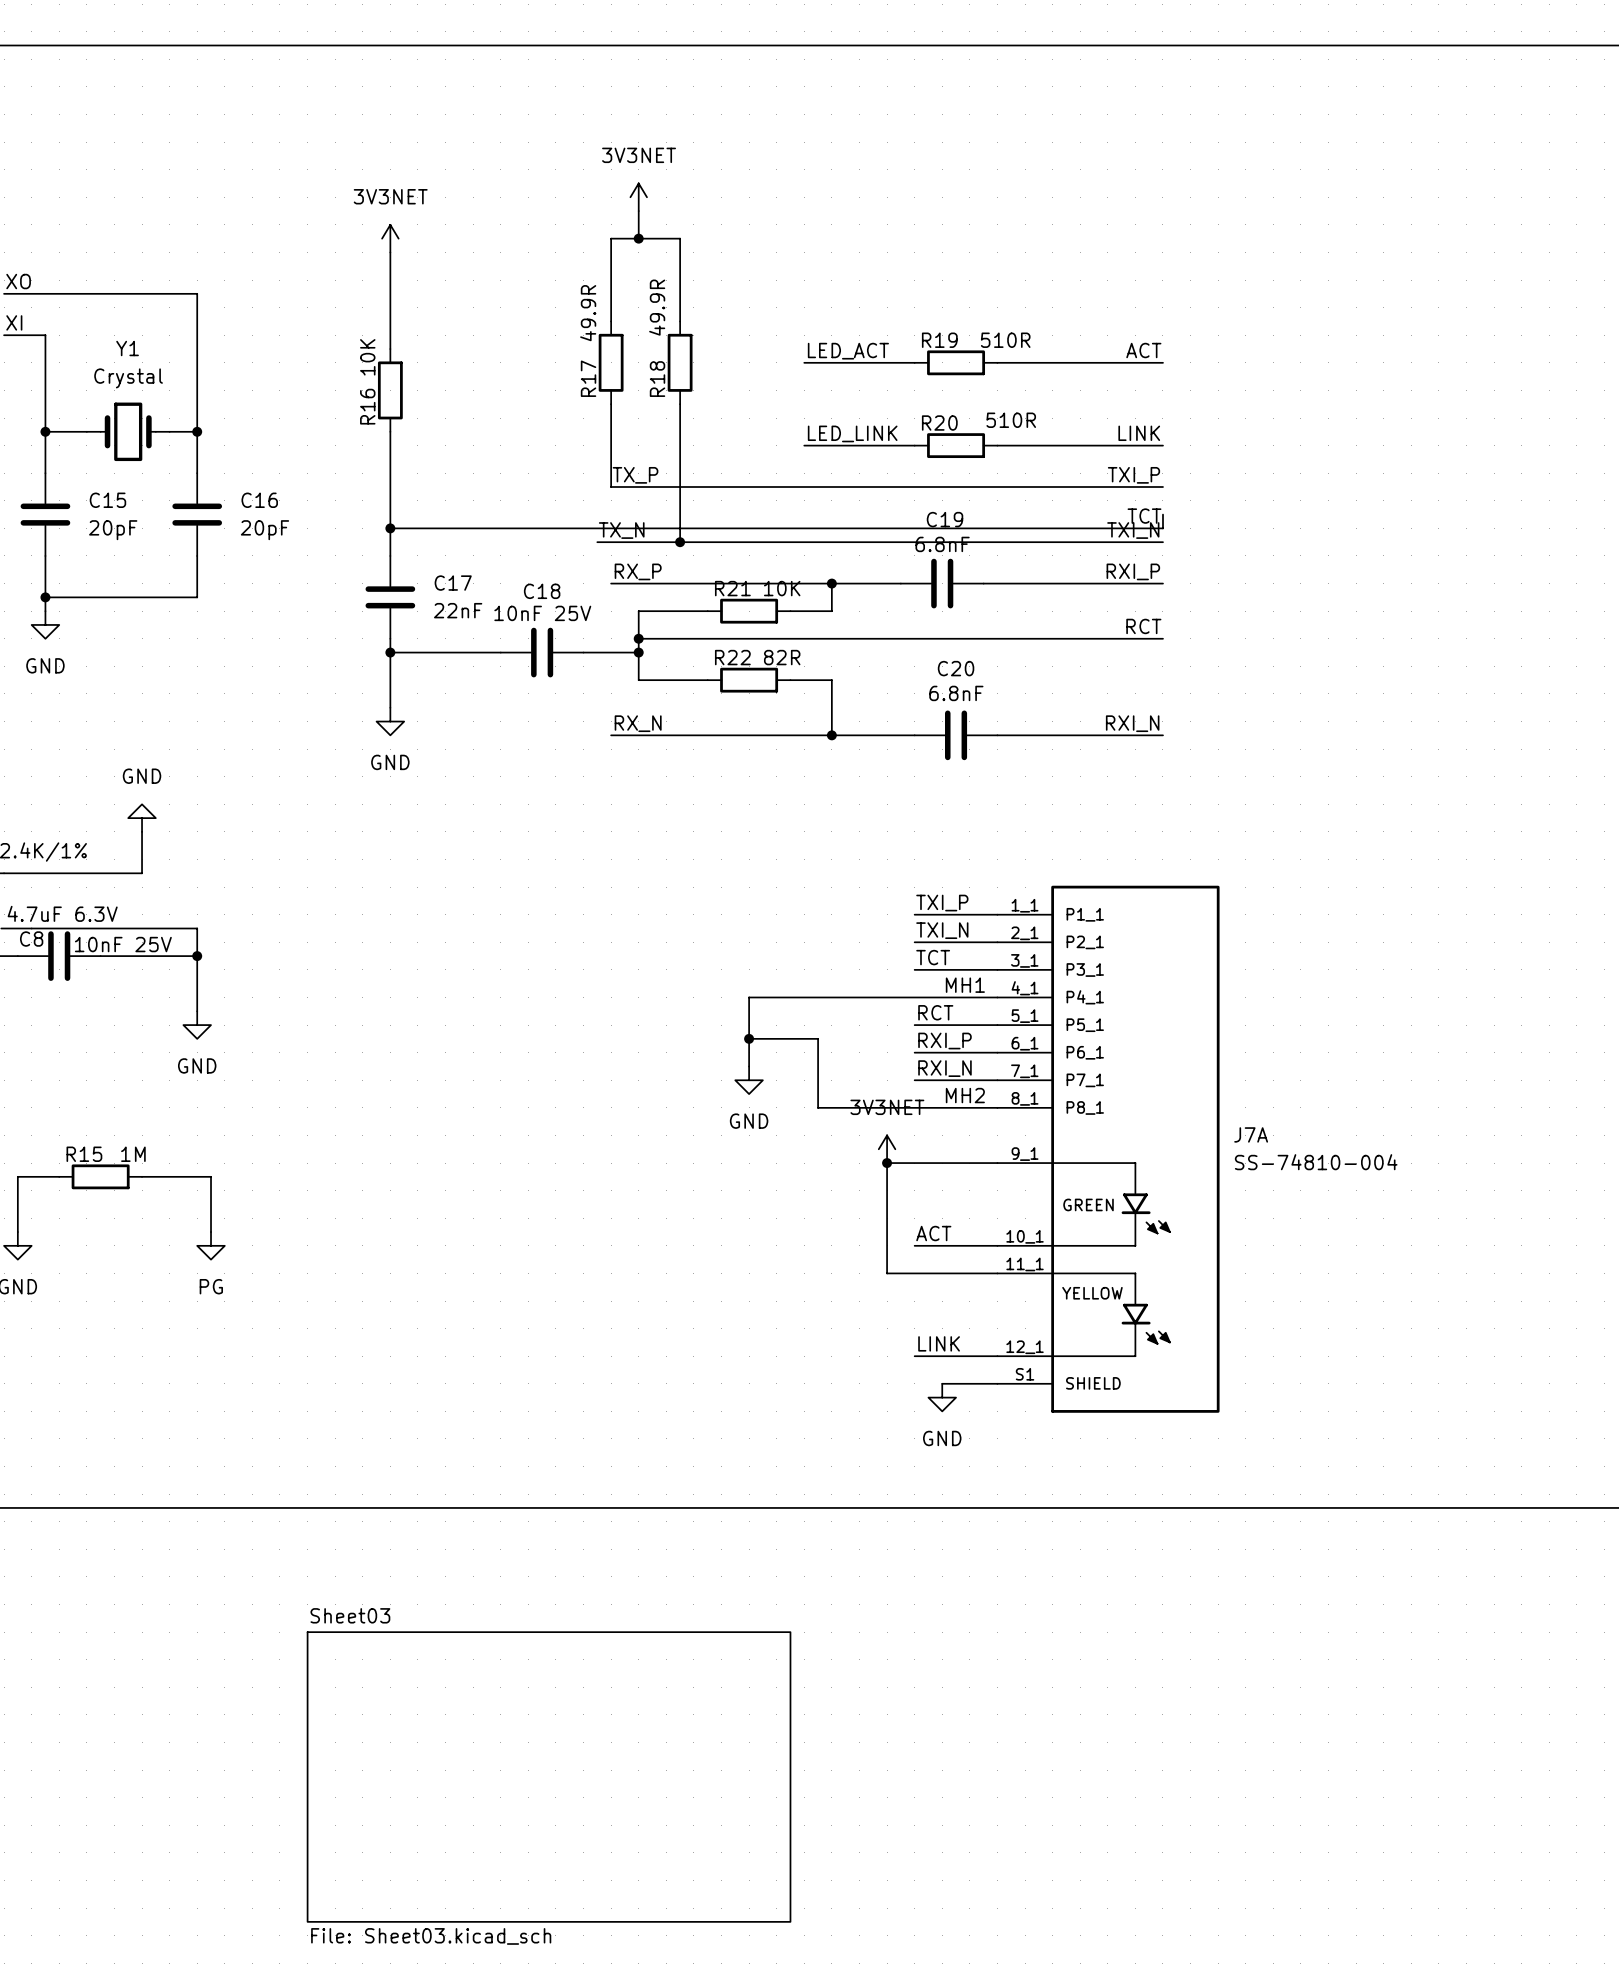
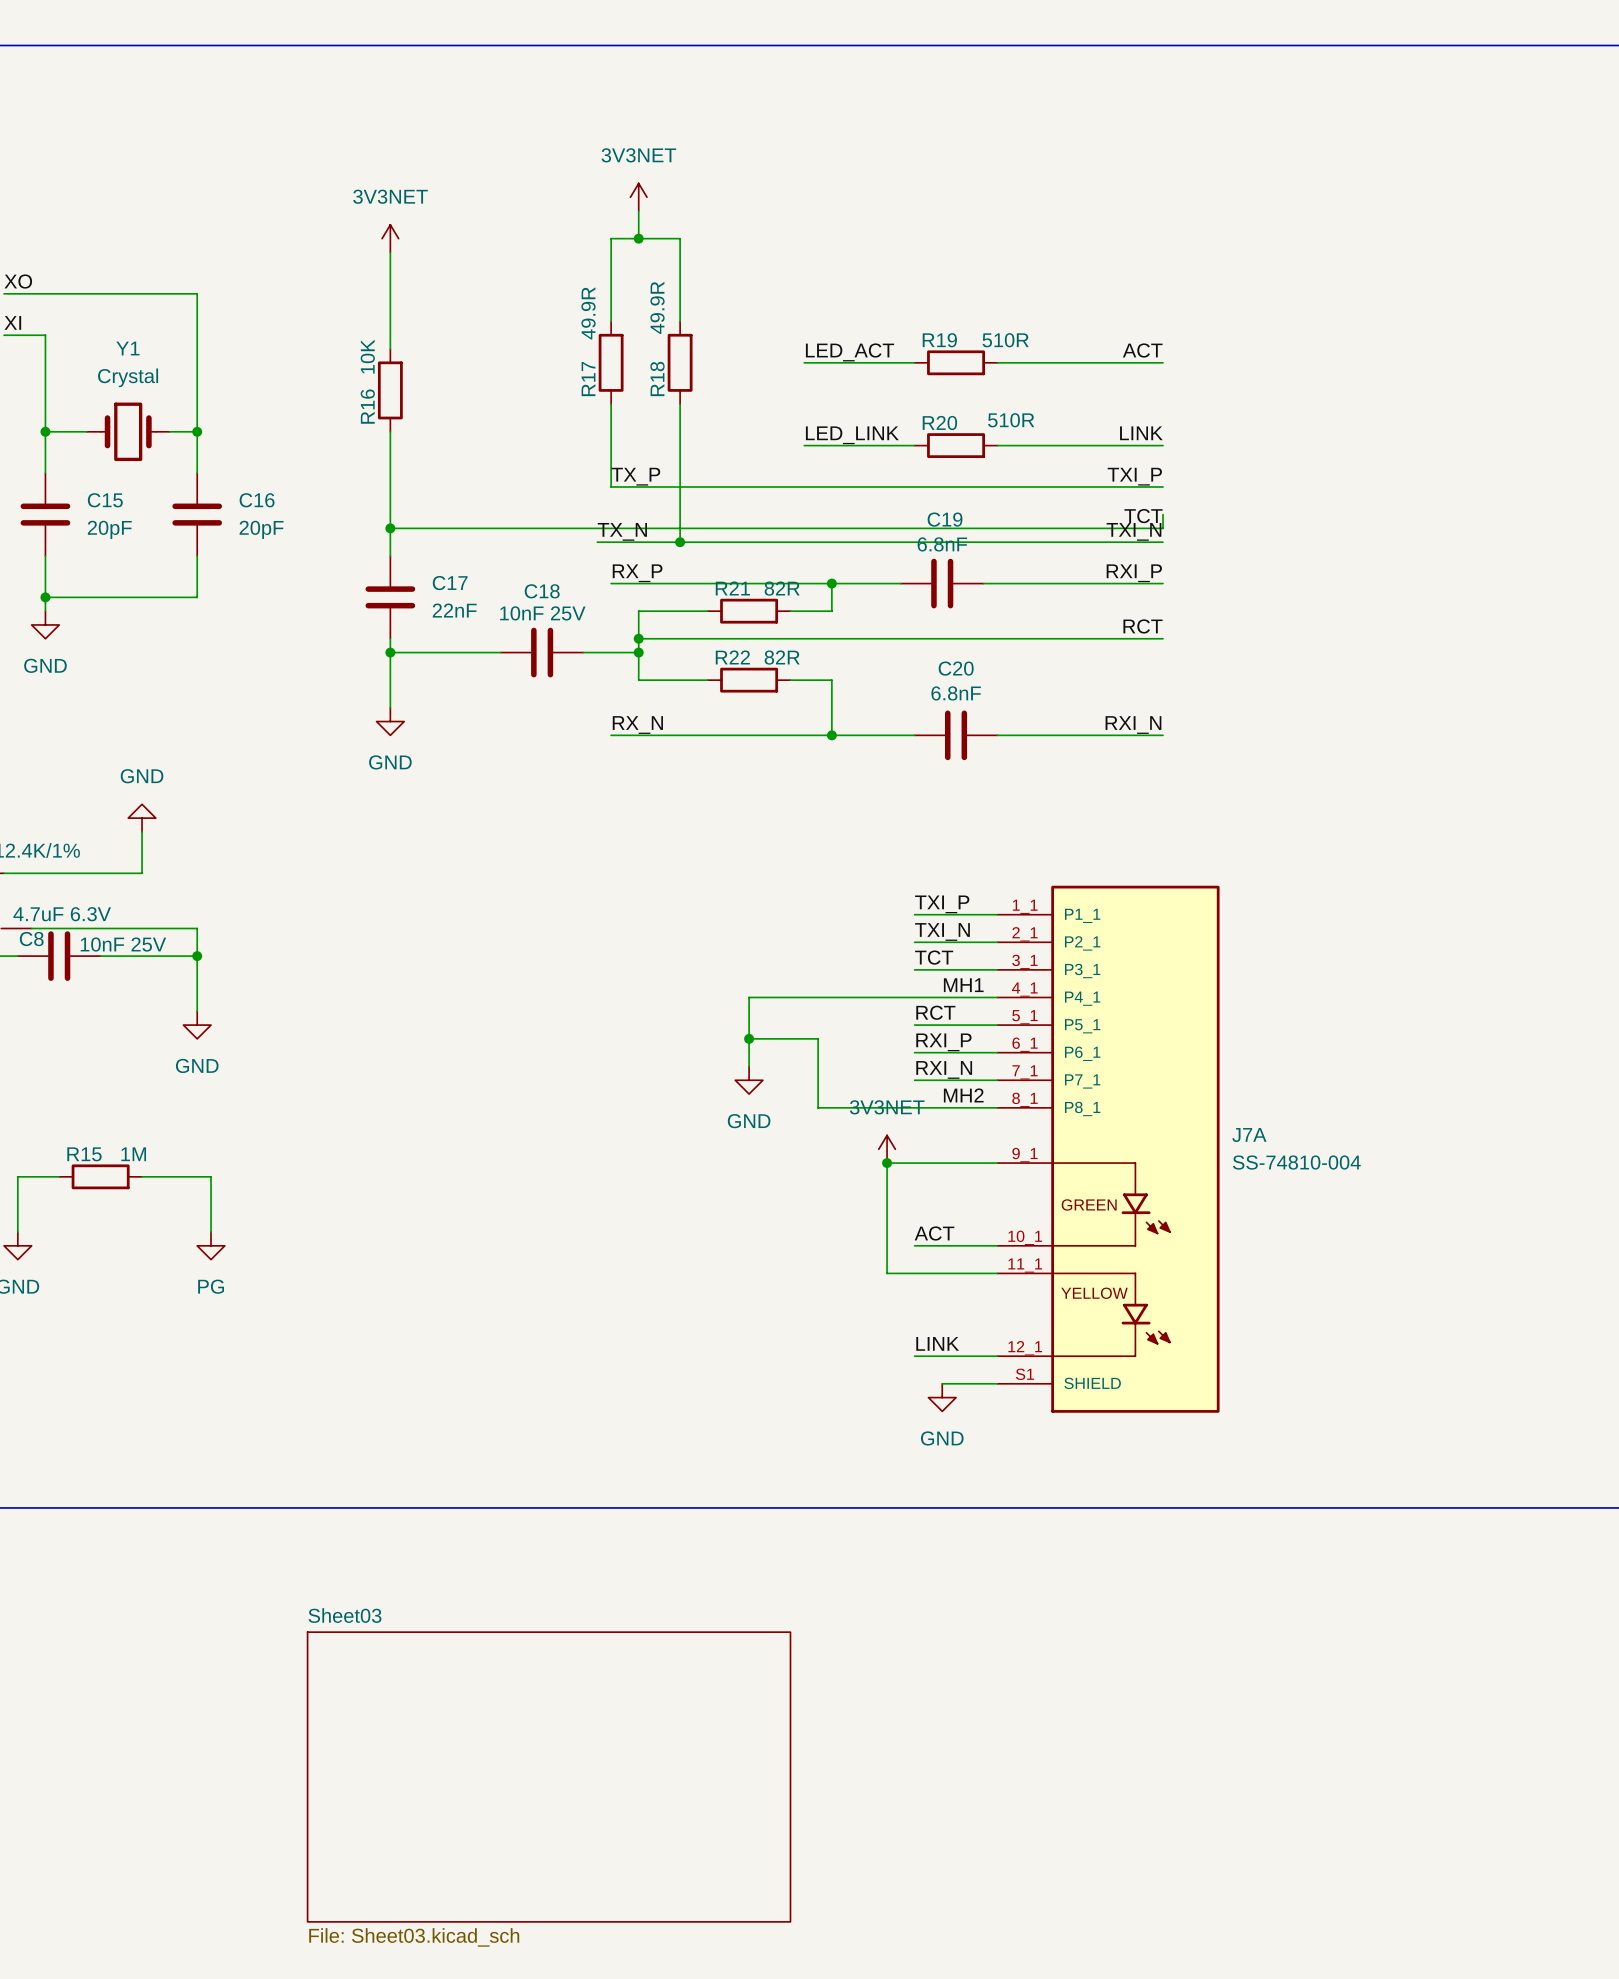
R21 value: 10K (782, 588) -> 82R (782, 588)

